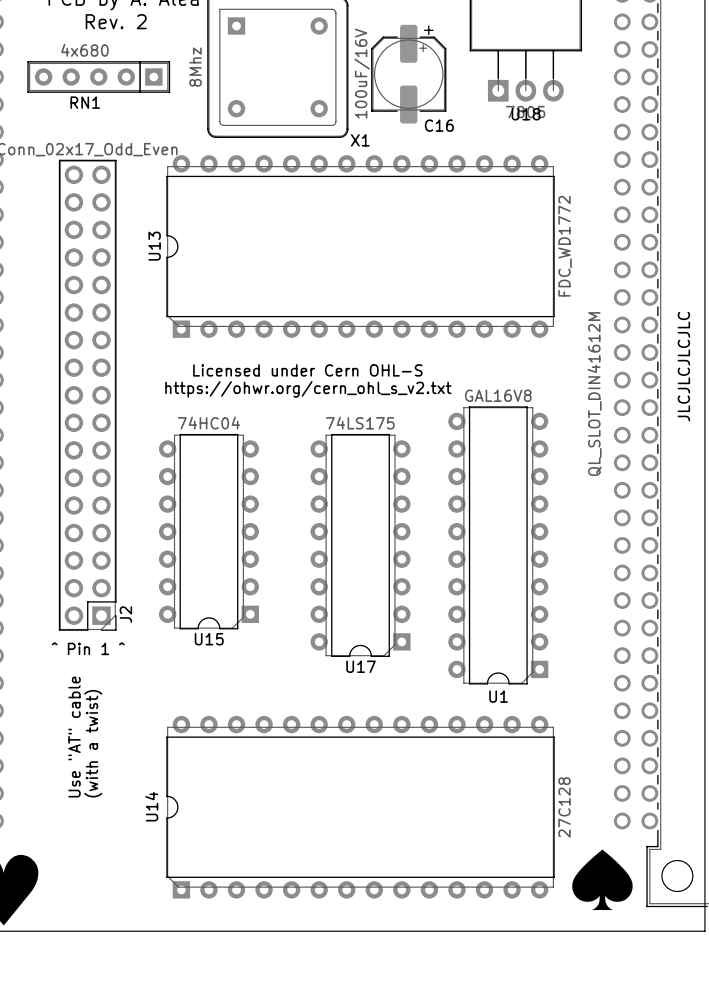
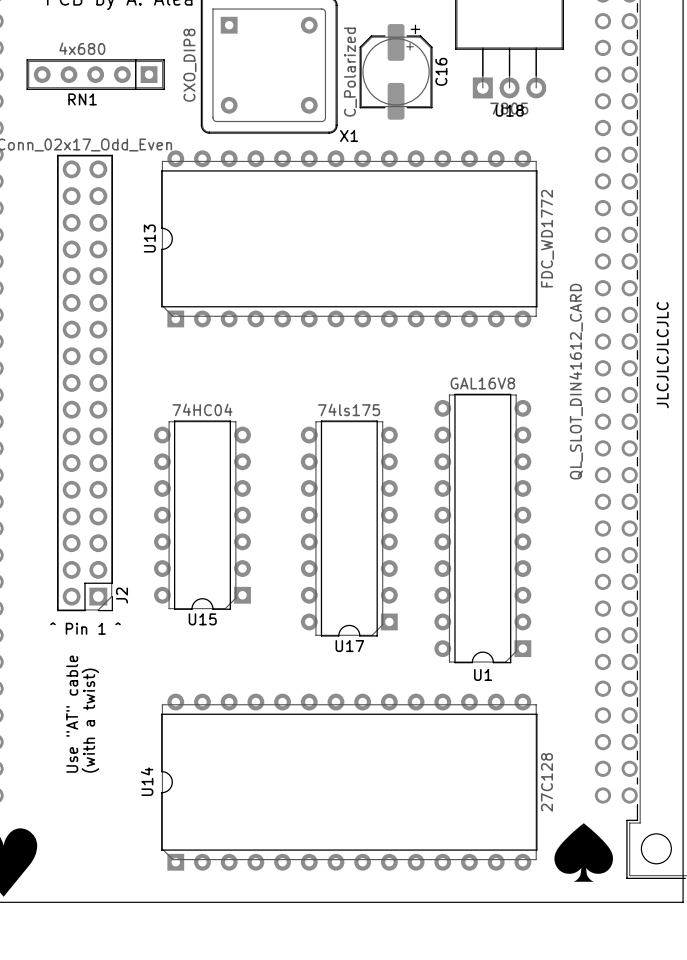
text: Rev. 2 (116, 21) -> none
X1 value: 8Mhz (195, 67) -> CXO_DIP8 (189, 65)
C16 value: 100uF/16V (362, 73) -> C_Polarized (350, 72)
C16 name rotation: 0° (439, 125) -> 90° counterclockwise (441, 71)
C16 name position: C16 (439, 125) -> C16 (441, 71)
text: Licensed under Cern OHL-S (307, 370) -> none
text: https://ohwr.org/cern_ohl_s_v2.txt (308, 389) -> none
part value: QL_SLOT_DIN41612M (594, 394) -> QL_SLOT_DIN41612_CARD (576, 381)
U17 value: 74LS175 (360, 423) -> 74ls175 (349, 409)

